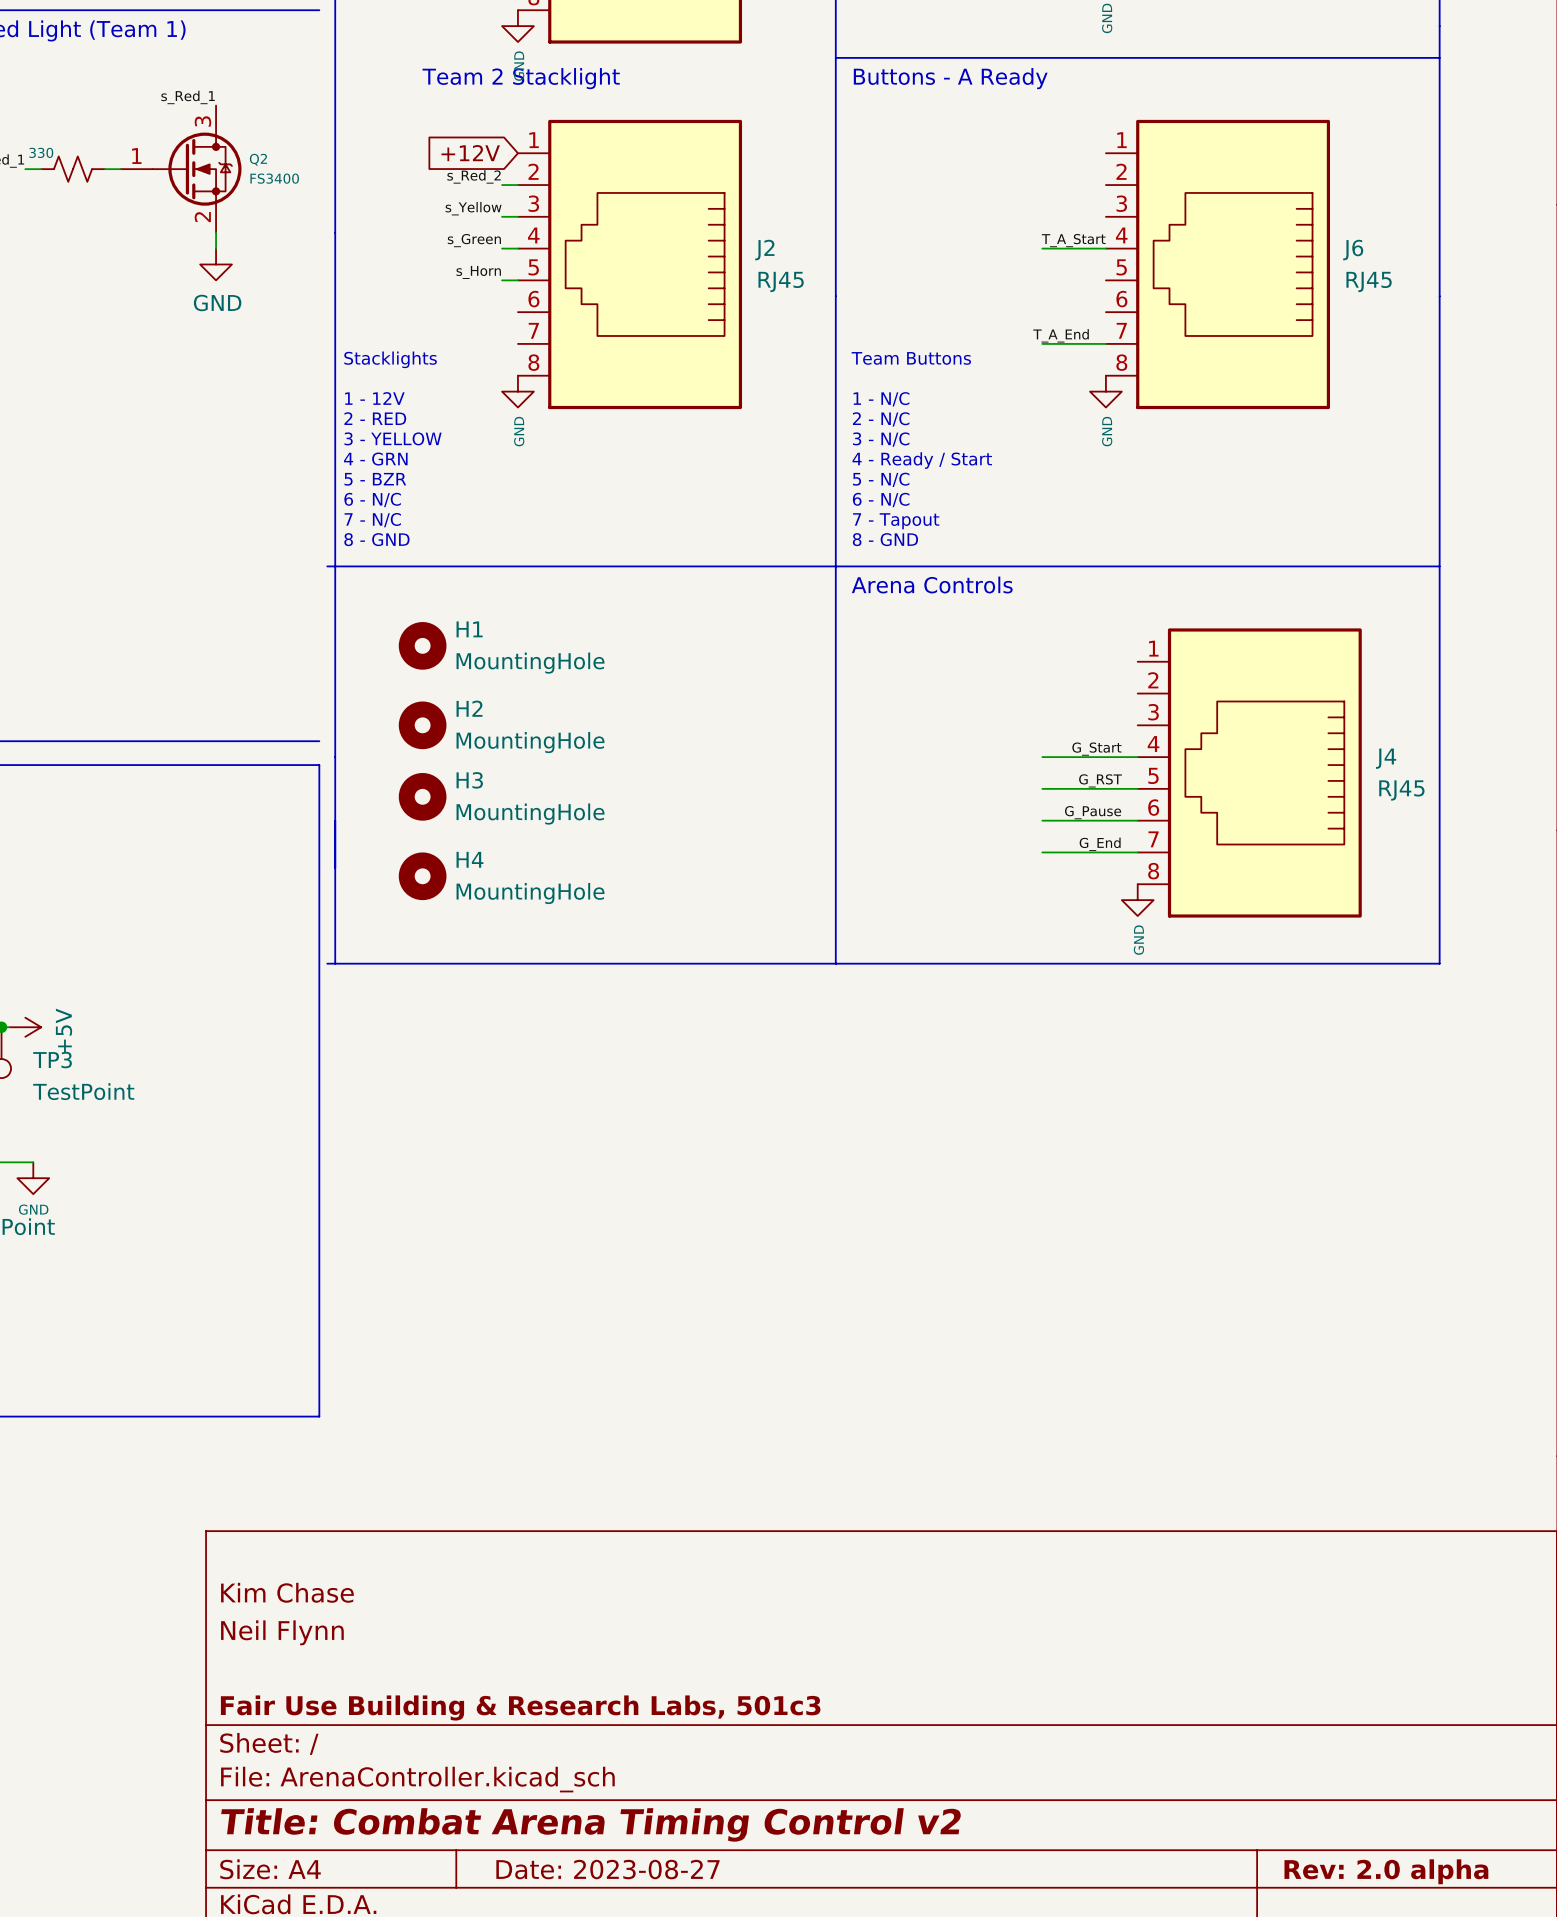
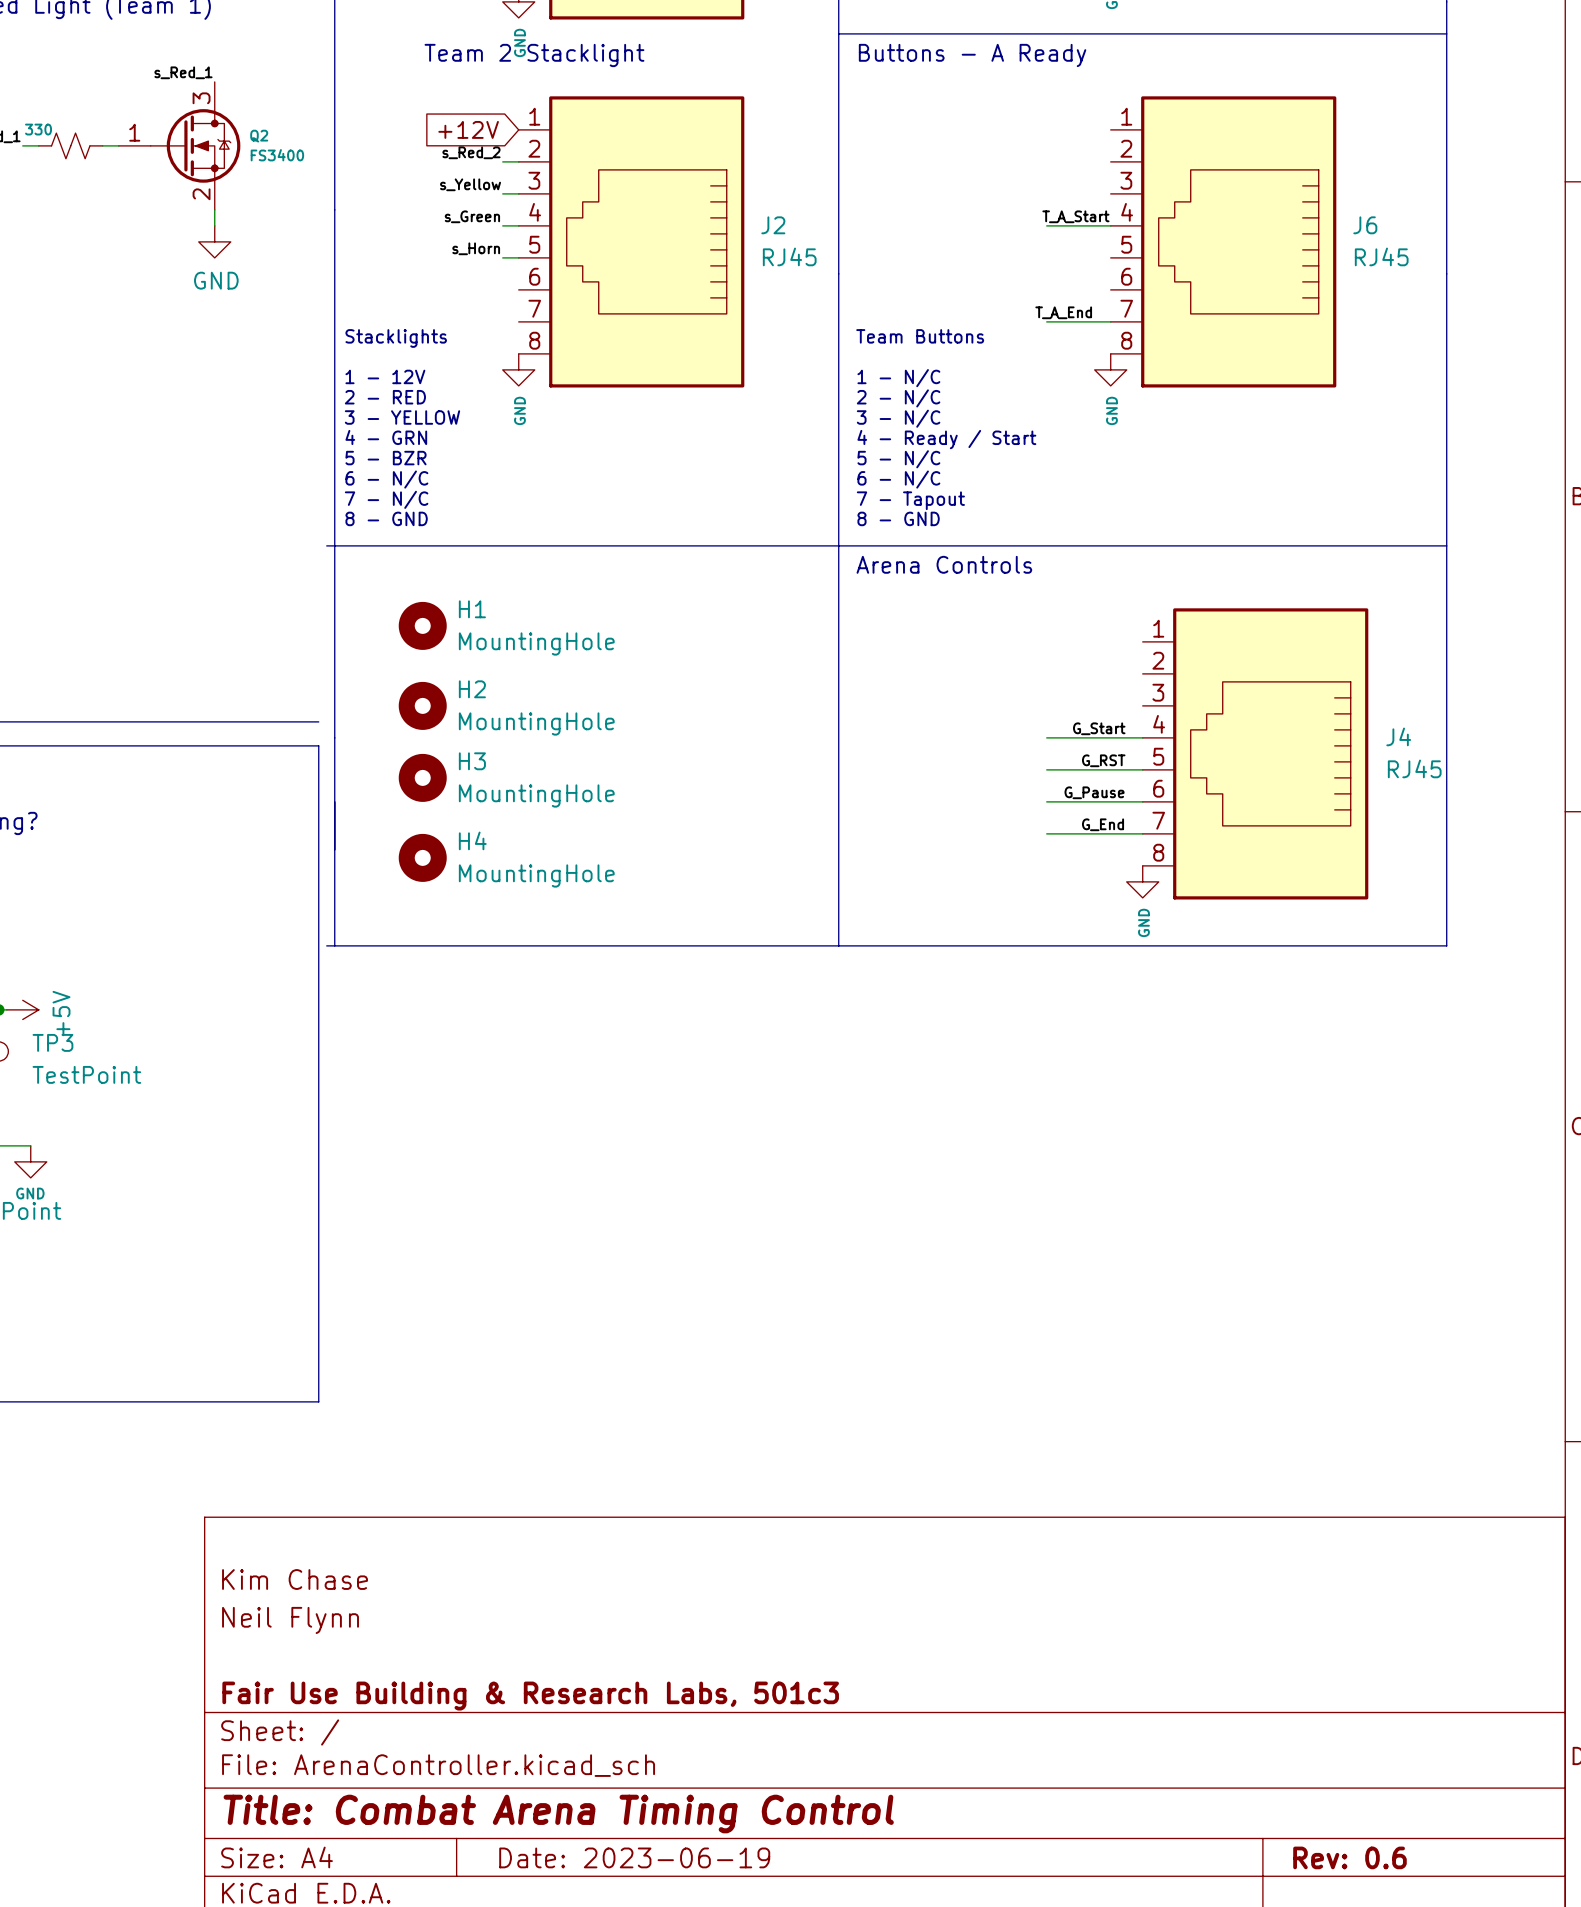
title block: Title: Combat Arena Timing Control v2 (591, 1824) -> Title: Combat Arena Timing Control (558, 1814)
title block: Date: 2023-08-27 (607, 1869) -> Date: 2023-06-19 (634, 1857)
title block: Rev: 2.0 alpha (1386, 1871) -> Rev: 0.6 (1349, 1857)

